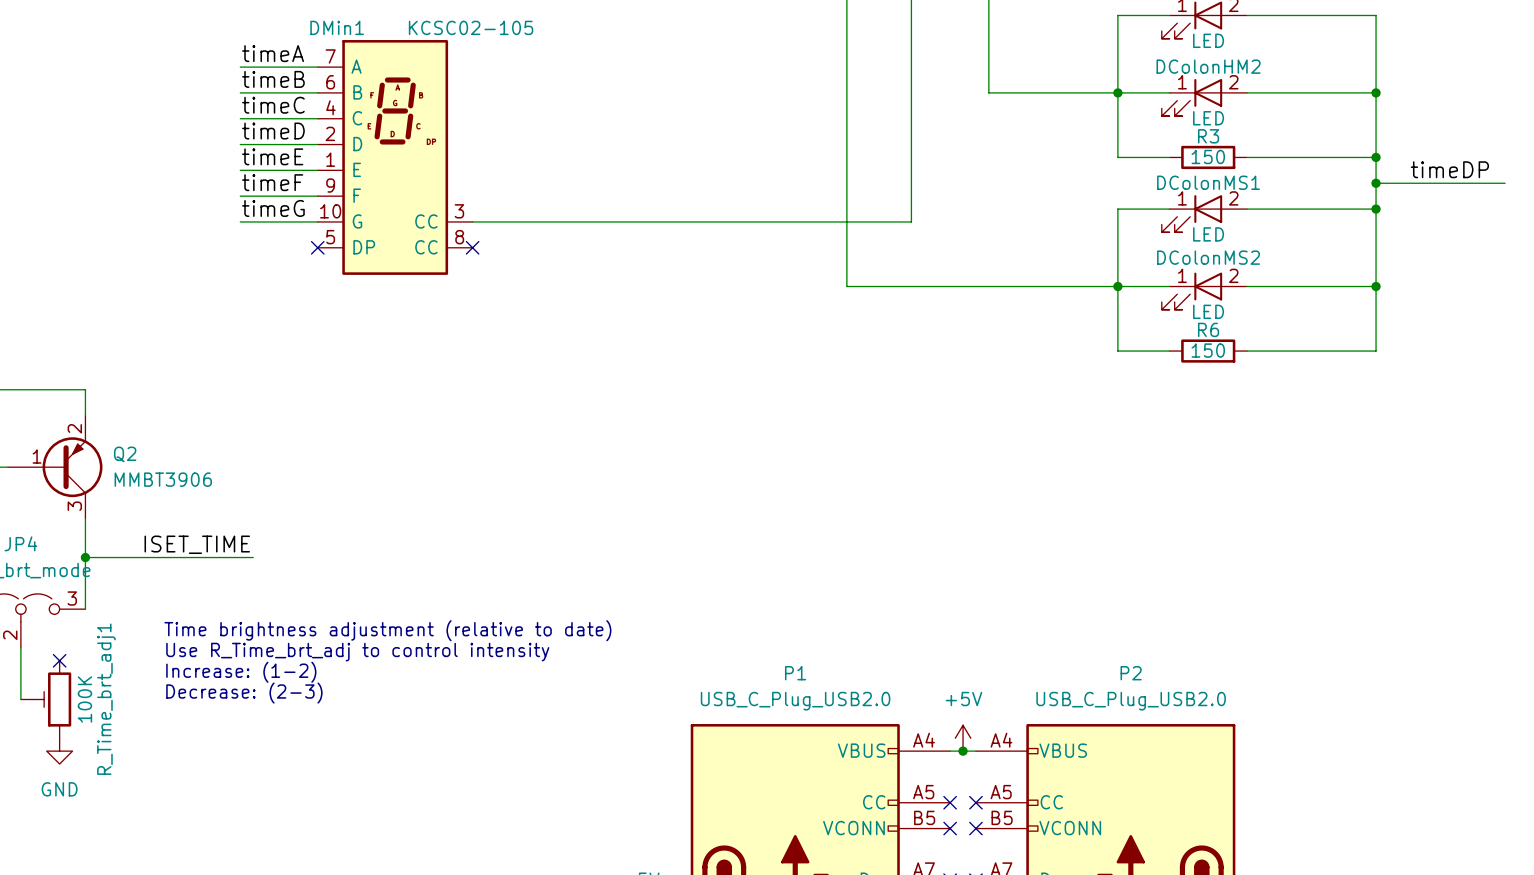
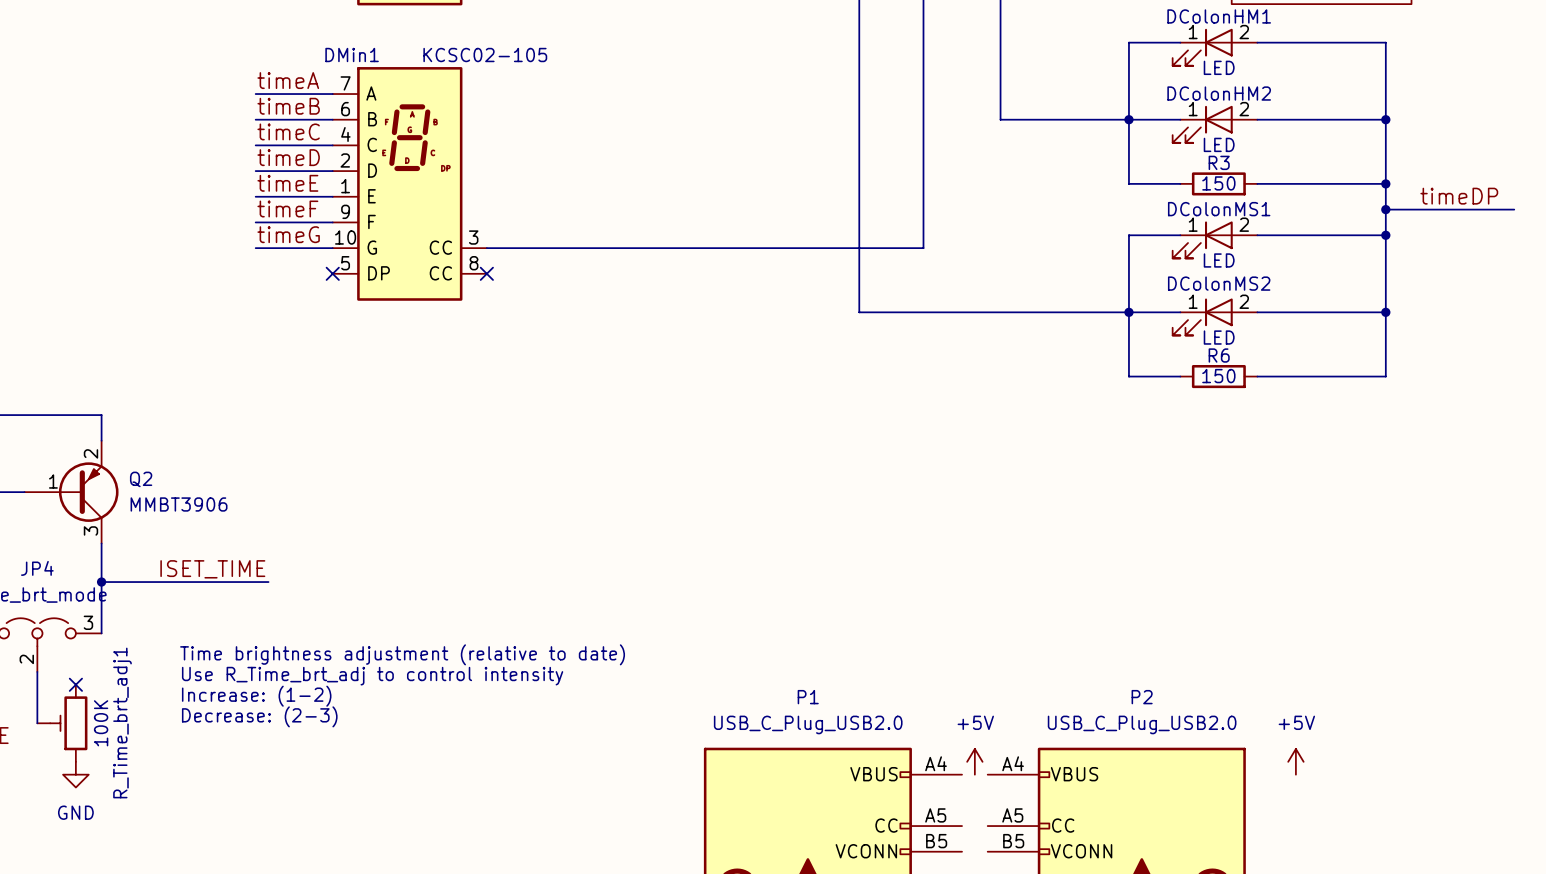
power symbol: none -> +5V (1295, 761)
wire: (950, 751) (975, 751) -> none
junction: (963, 751) -> none
no-connect mark: (950, 802) -> none
no-connect mark: (975, 802) -> none
no-connect mark: (950, 828) -> none
no-connect mark: (975, 828) -> none

